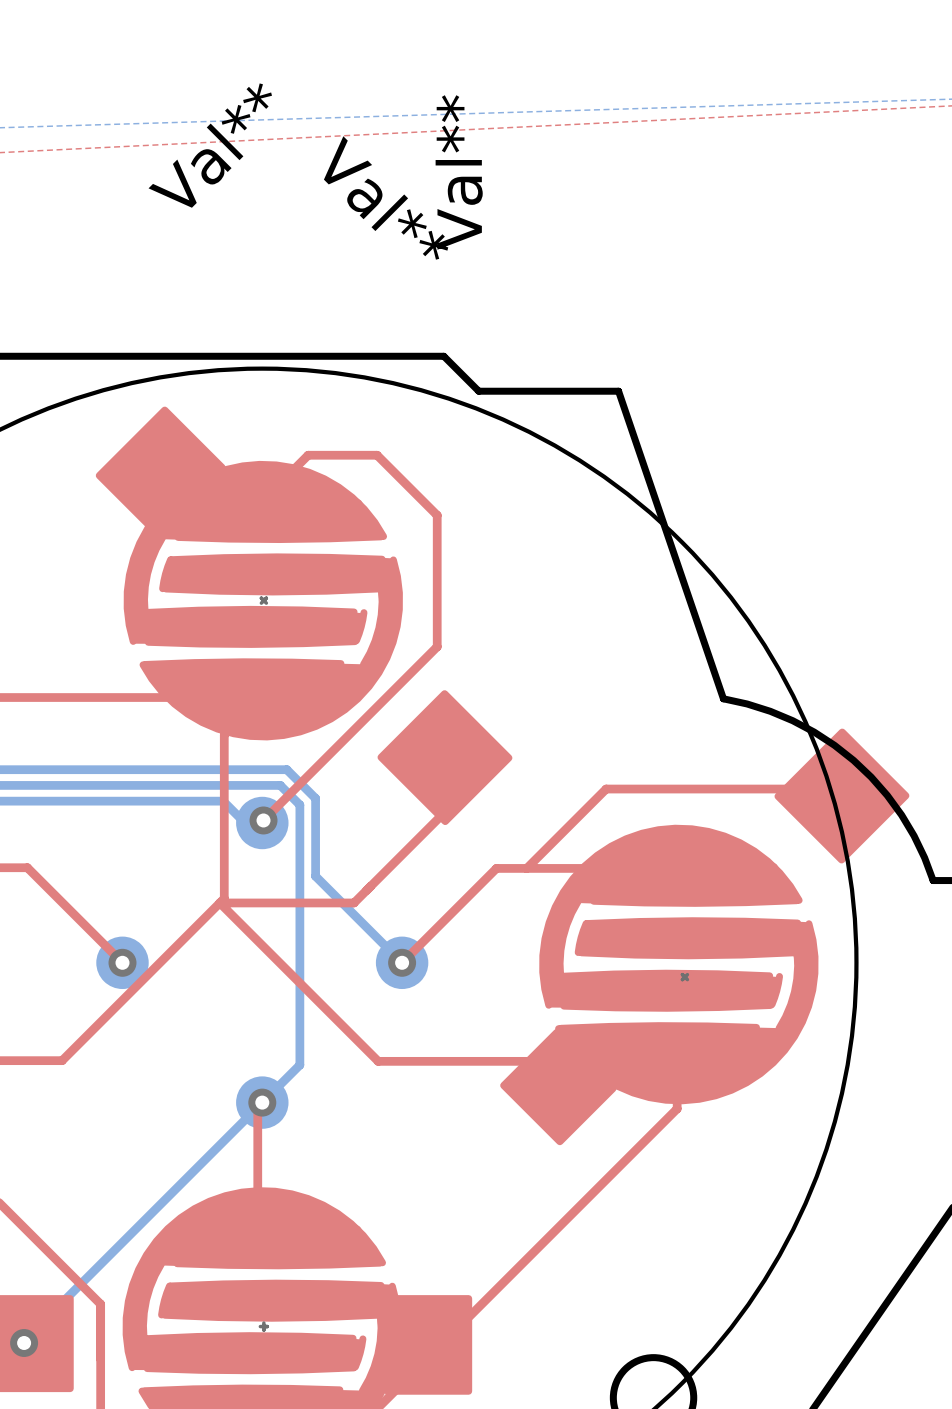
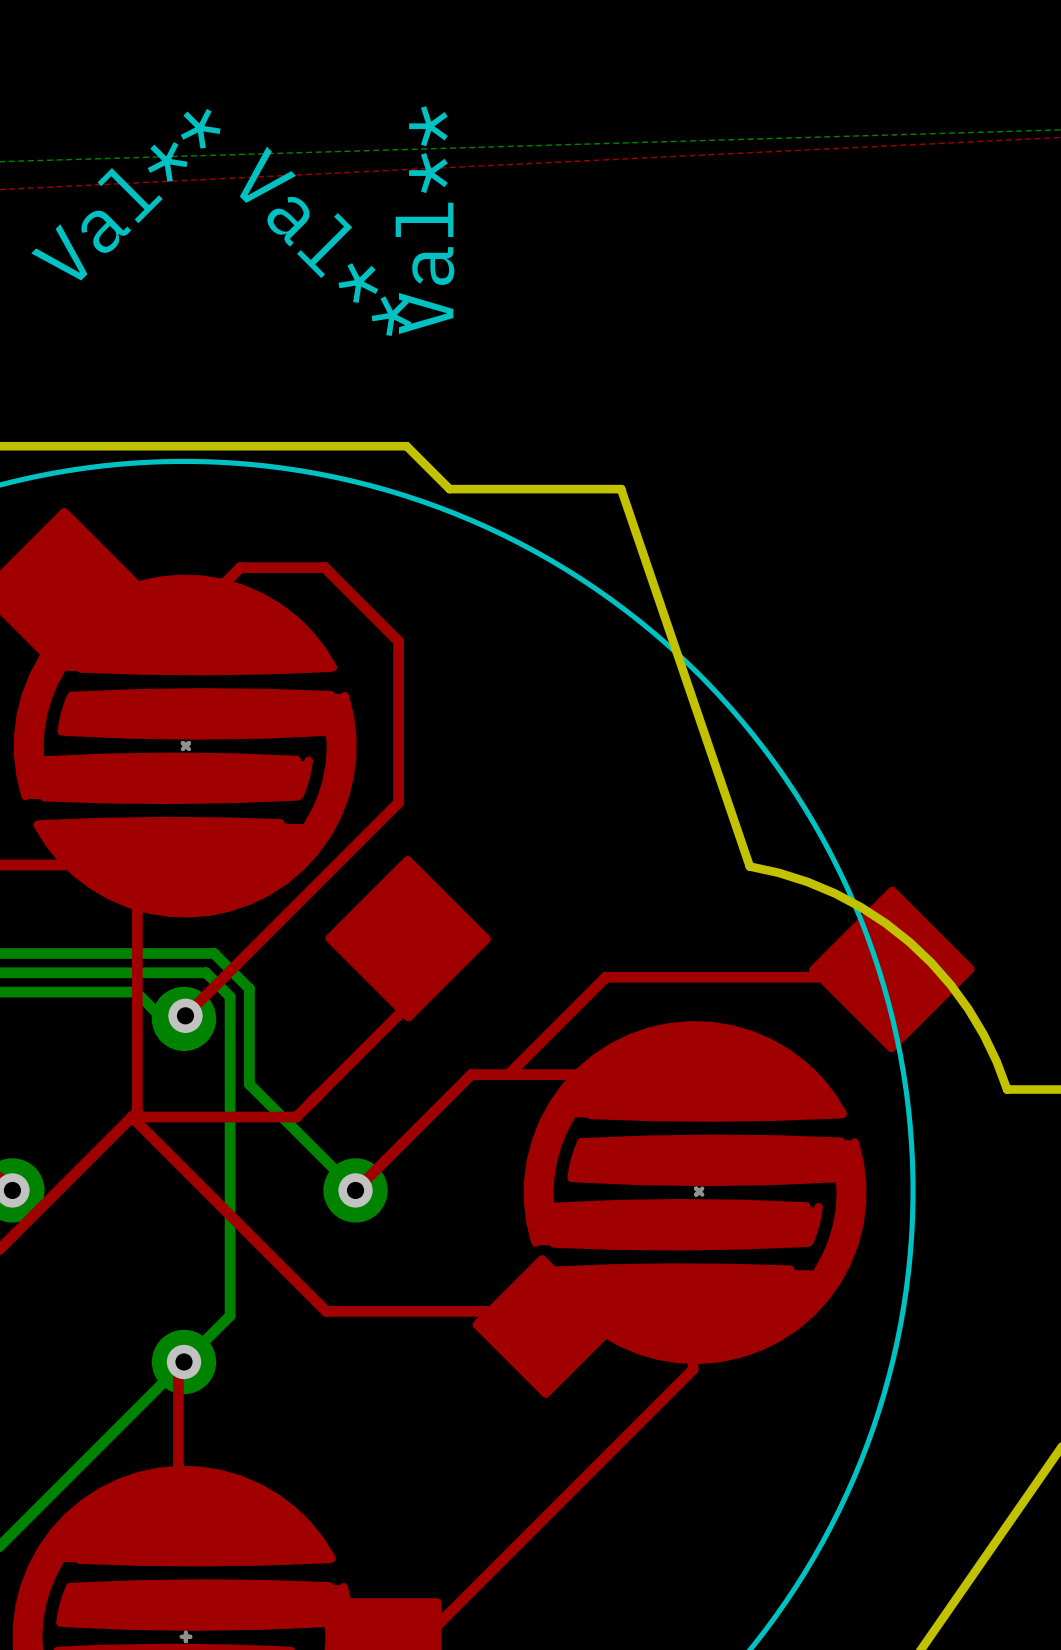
part position: (704, 936) -> (723, 1142)

